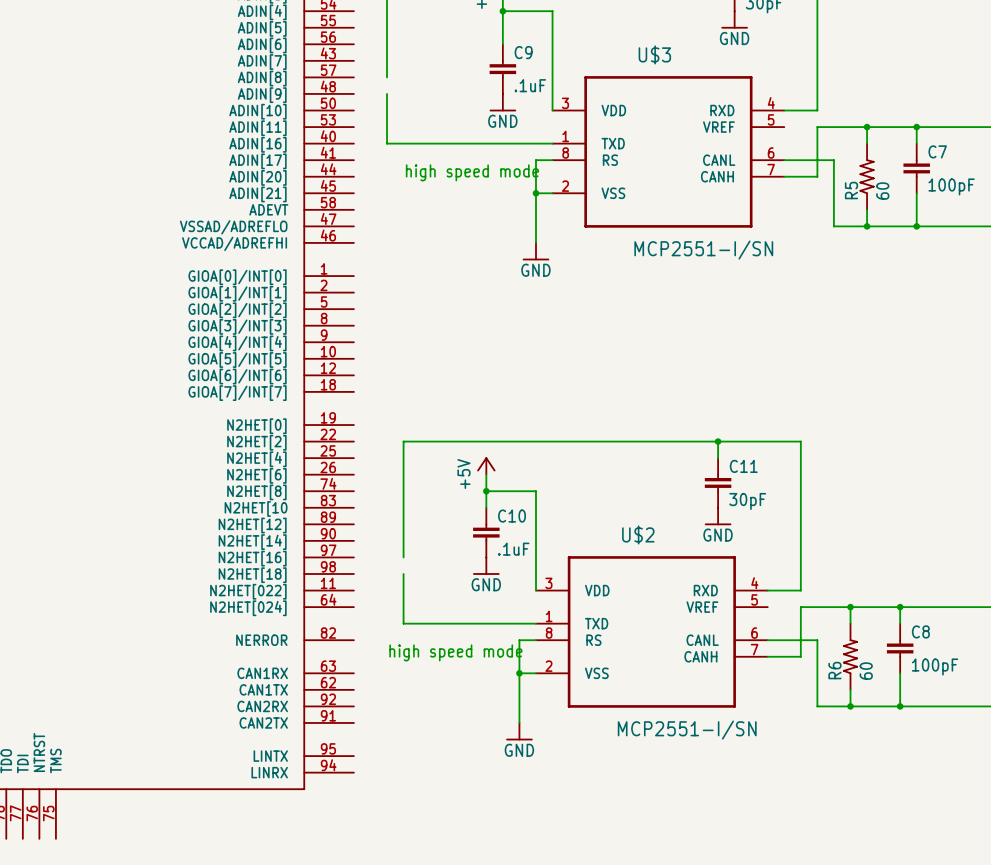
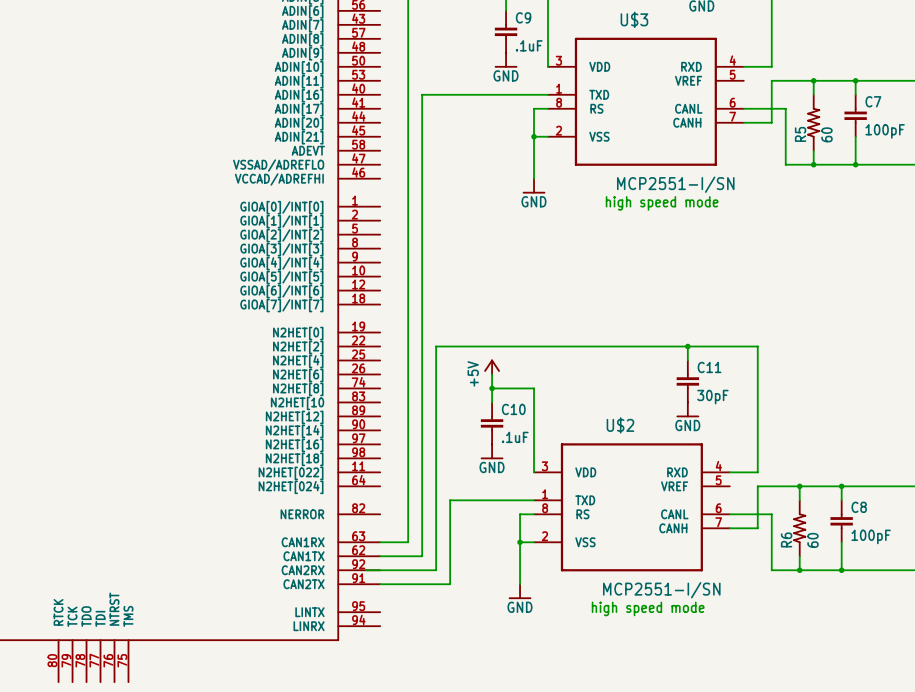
wire: none -> (408, 38) (408, 52)
wire: (387, 143) (403, 143) -> (422, 346) (422, 94)
wire: none -> (408, 94) (408, 542) (380, 542)
text: high speed mode (472, 172) -> none
text: none -> high speed mode (662, 203)
wire: (403, 441) (420, 441) -> (366, 570) (436, 570) (436, 346)
wire: none -> (422, 444) (422, 458)
wire: (403, 623) (436, 623) -> (422, 500) (422, 556) (380, 556)
wire: none -> (450, 500) (450, 584) (380, 584)
text: high speed mode (455, 652) -> none
text: none -> high speed mode (648, 608)

